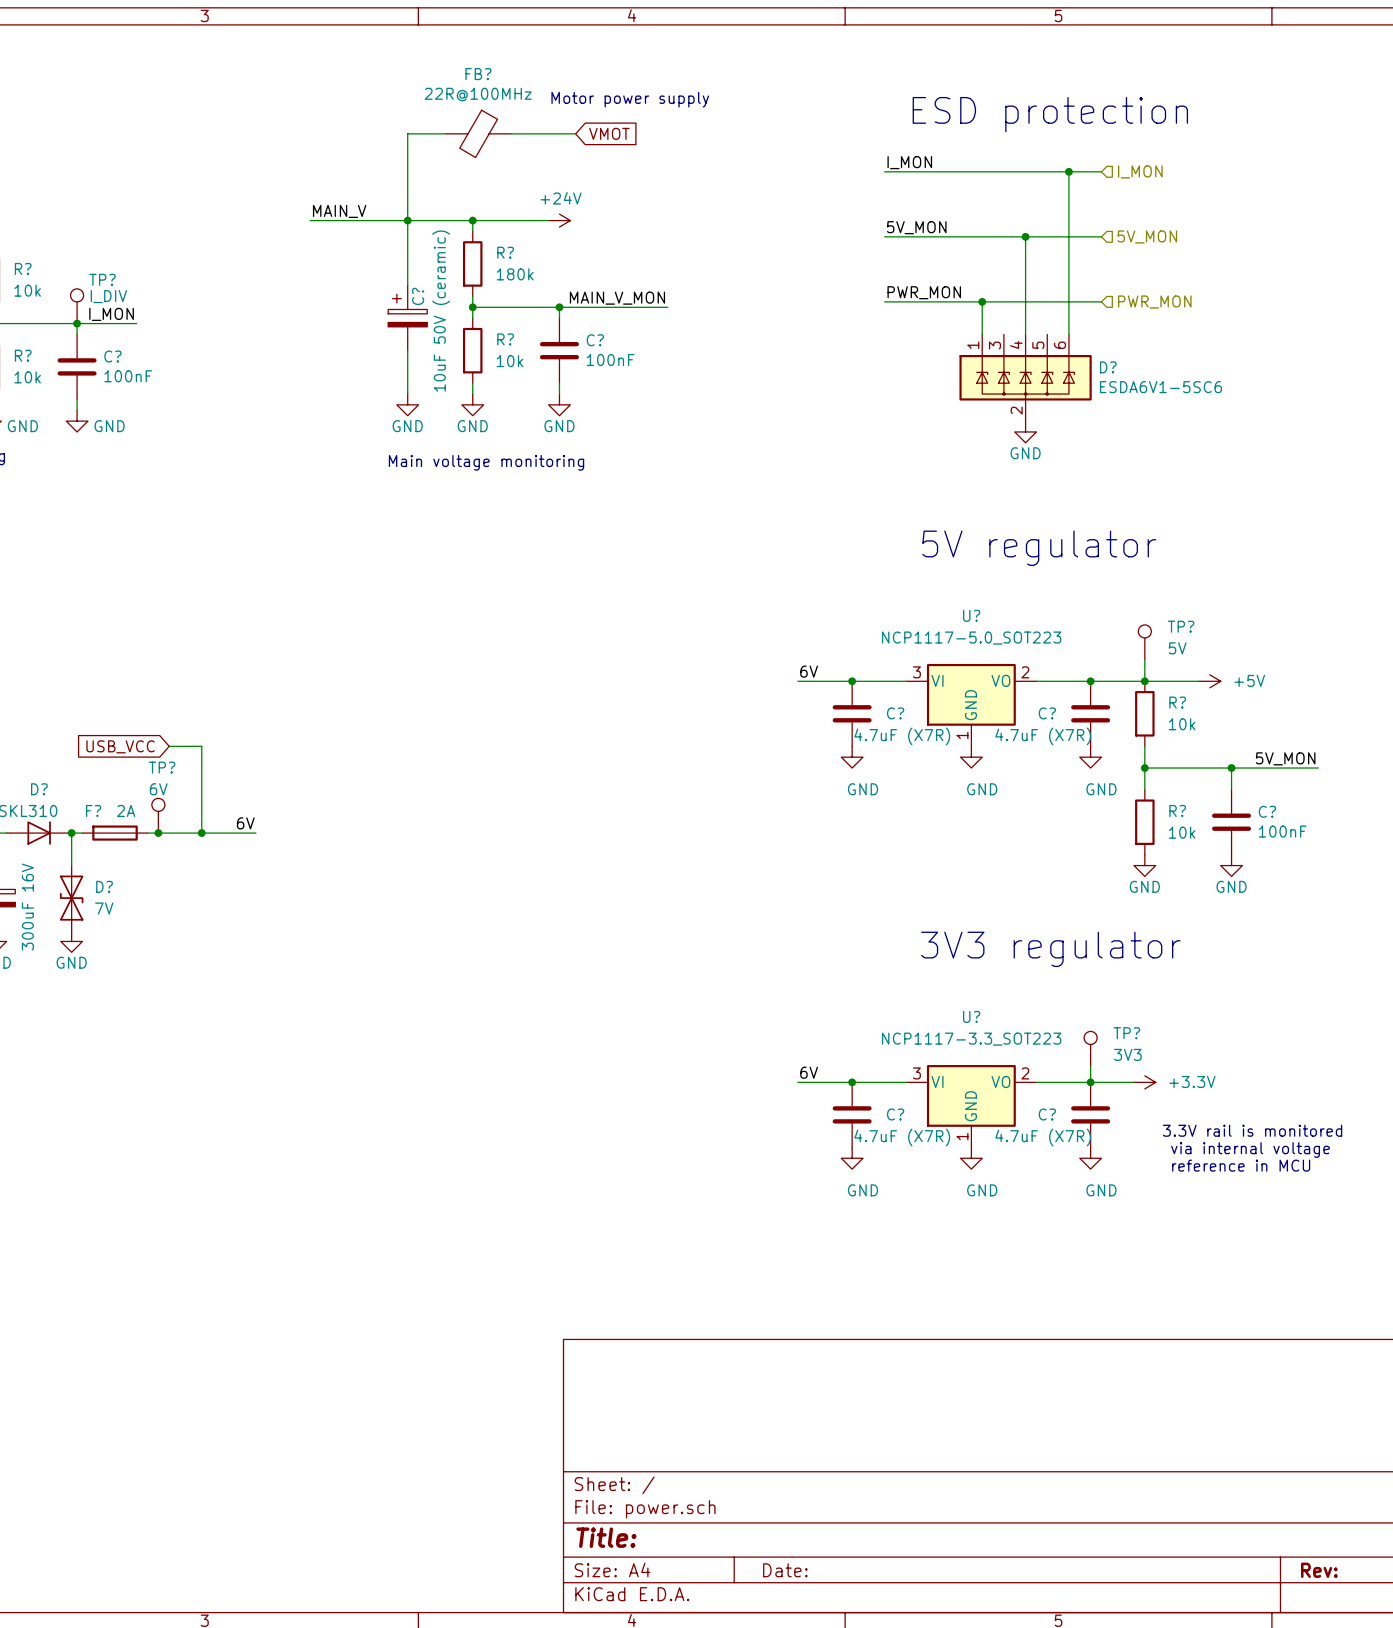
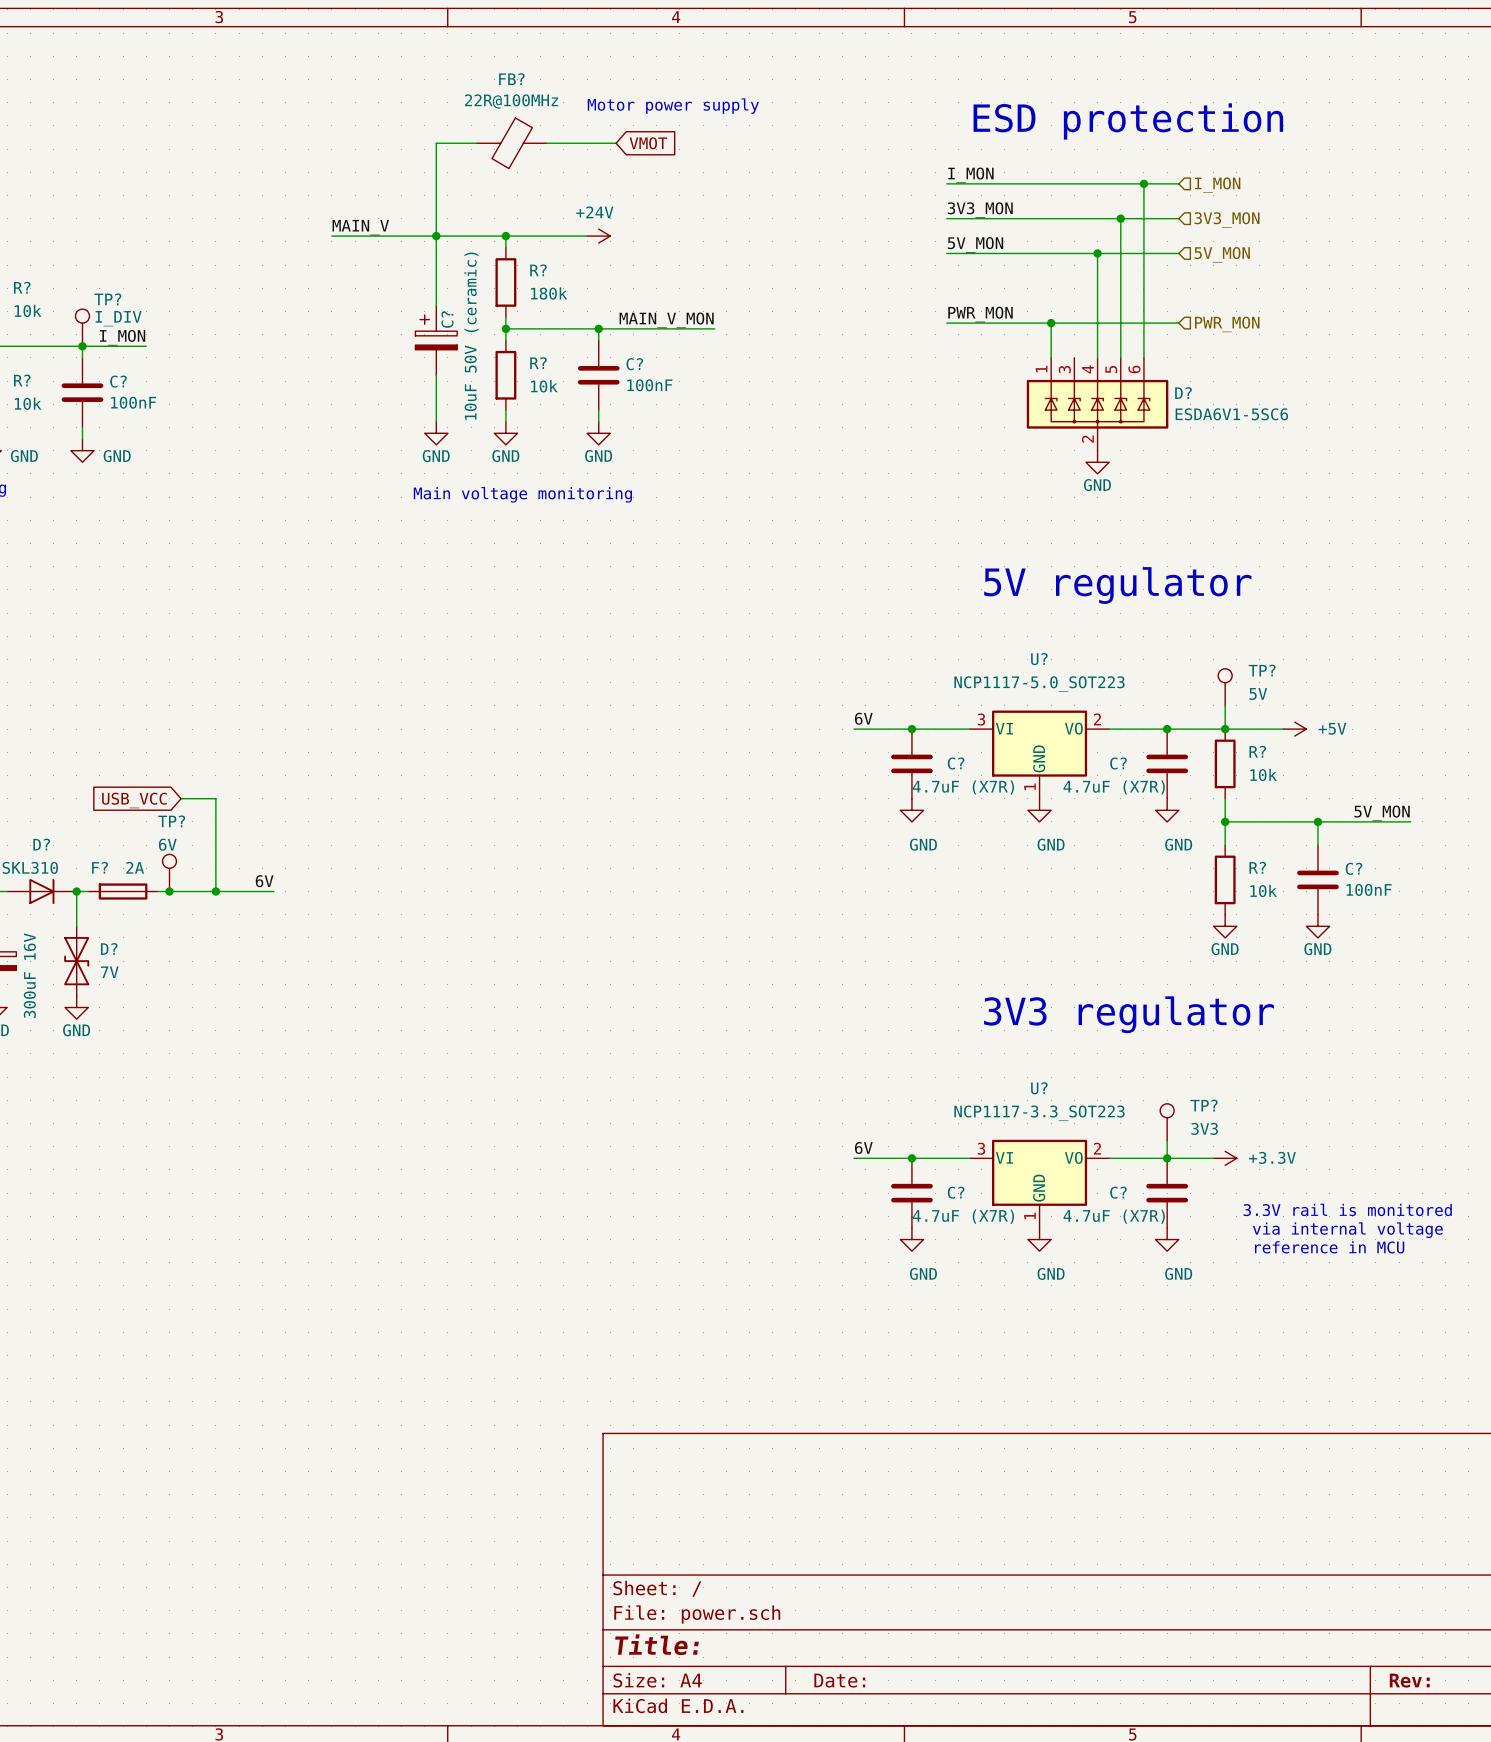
label: none -> 3V3_MON (980, 210)
wire: none -> (946, 218) (1178, 218)
wire: none -> (1120, 218) (1120, 357)
junction: none -> (1120, 218)
hierarchical label: none -> 3V3_MON (1227, 220)

